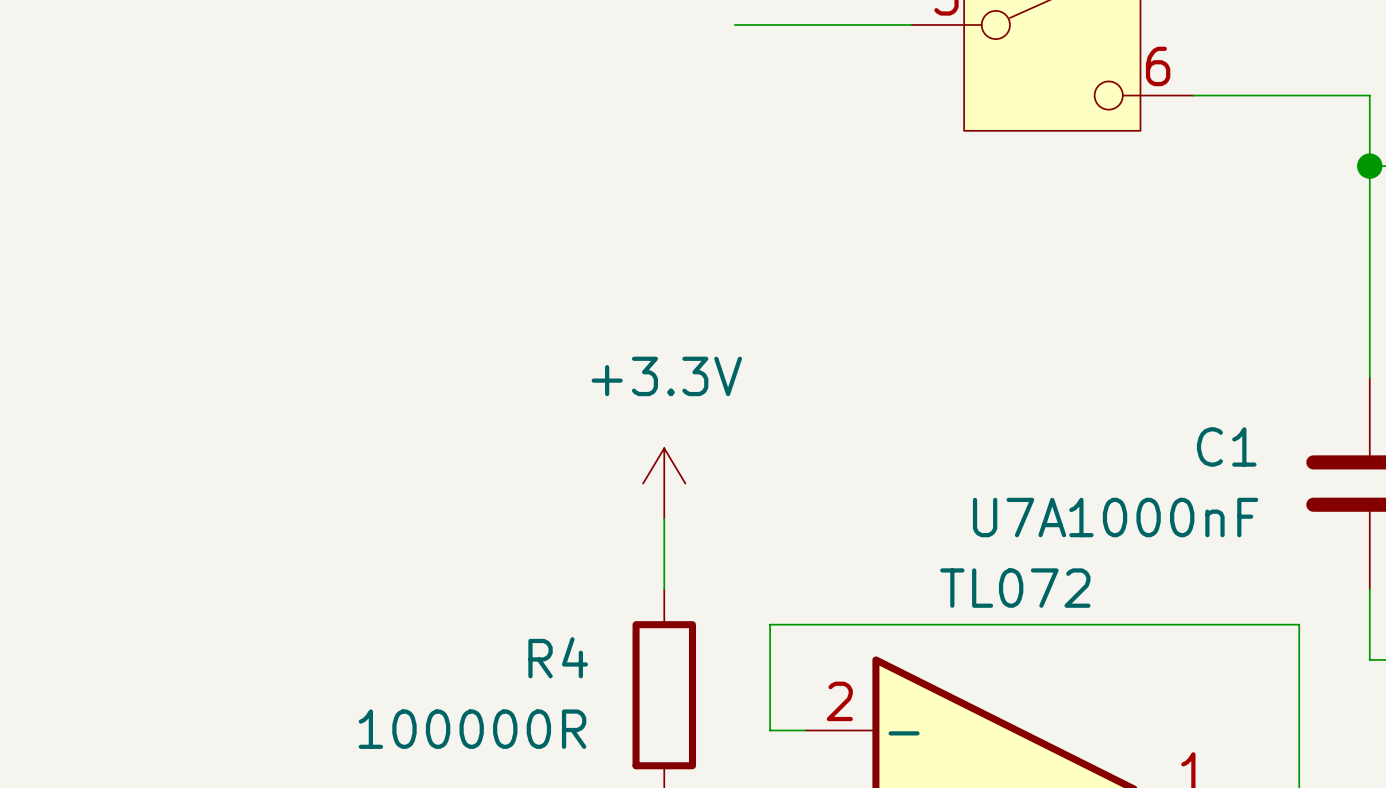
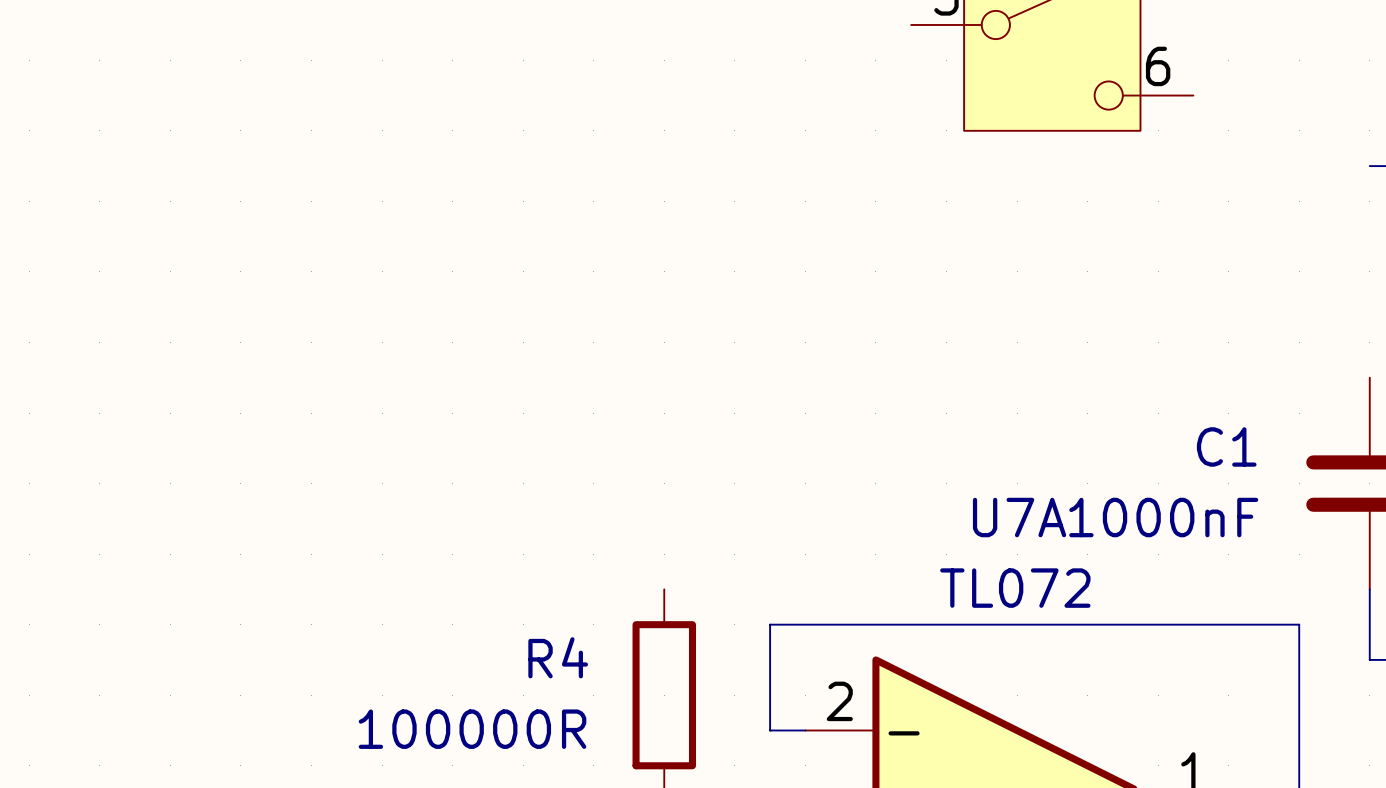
wire: (734, 24) (911, 24) -> none
wire: (1193, 95) (1369, 95) (1369, 377) -> none
junction: (1369, 166) -> none
power symbol: +3.3V (664, 483) -> none
wire: (664, 518) (664, 589) -> none

